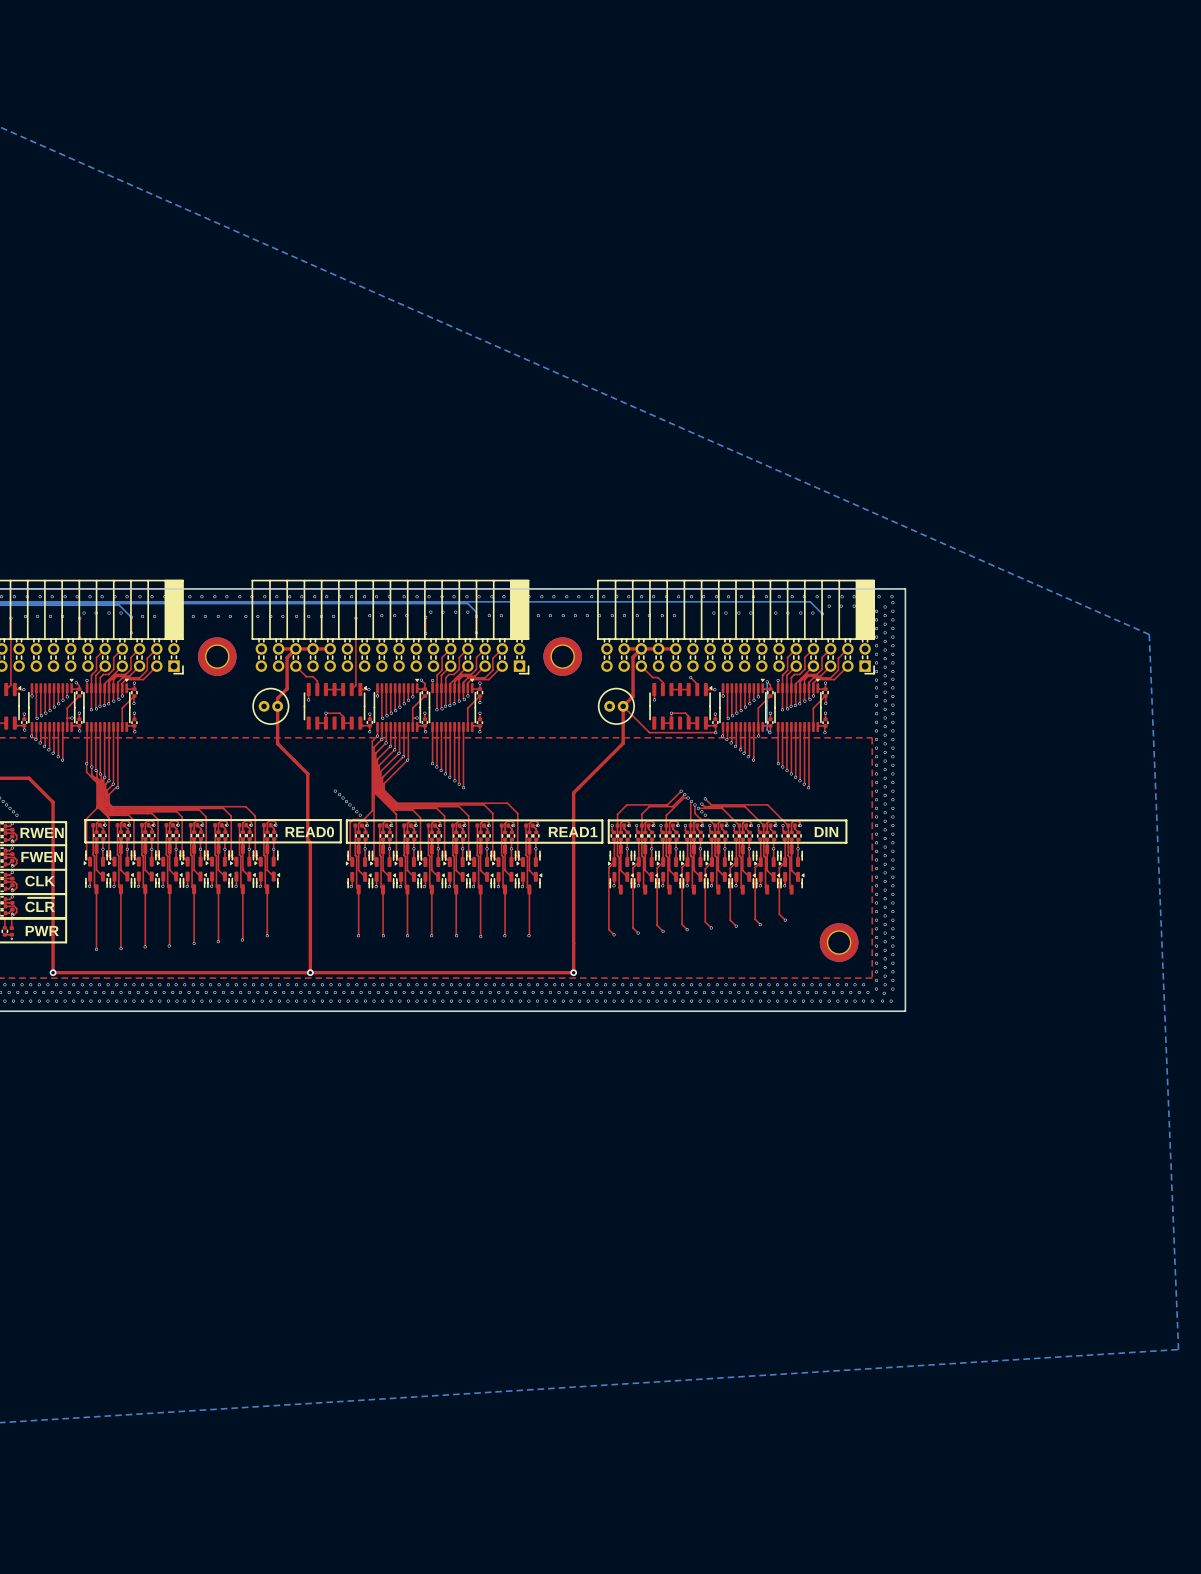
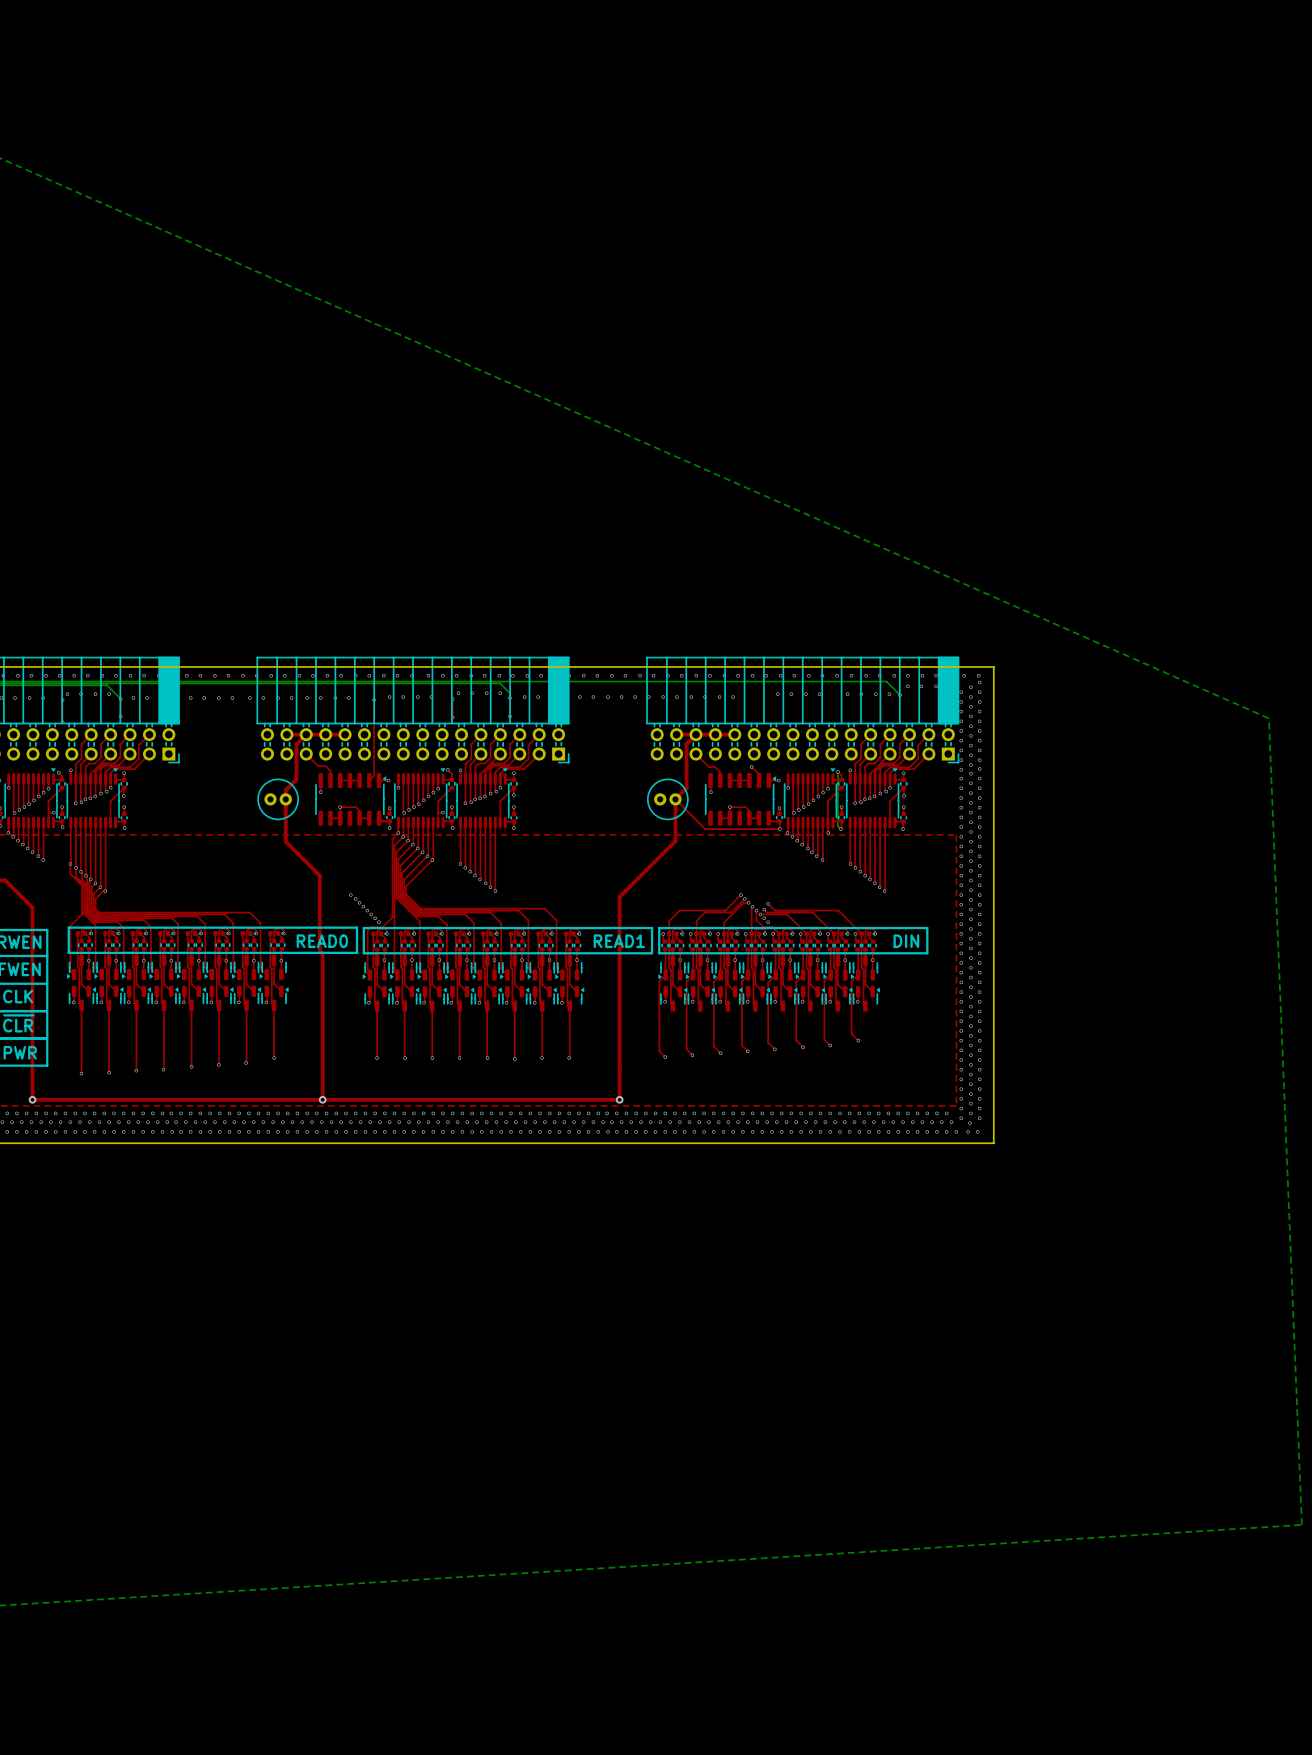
part: (217, 656) -> none
part: (562, 656) -> none
part: (839, 942) -> none

